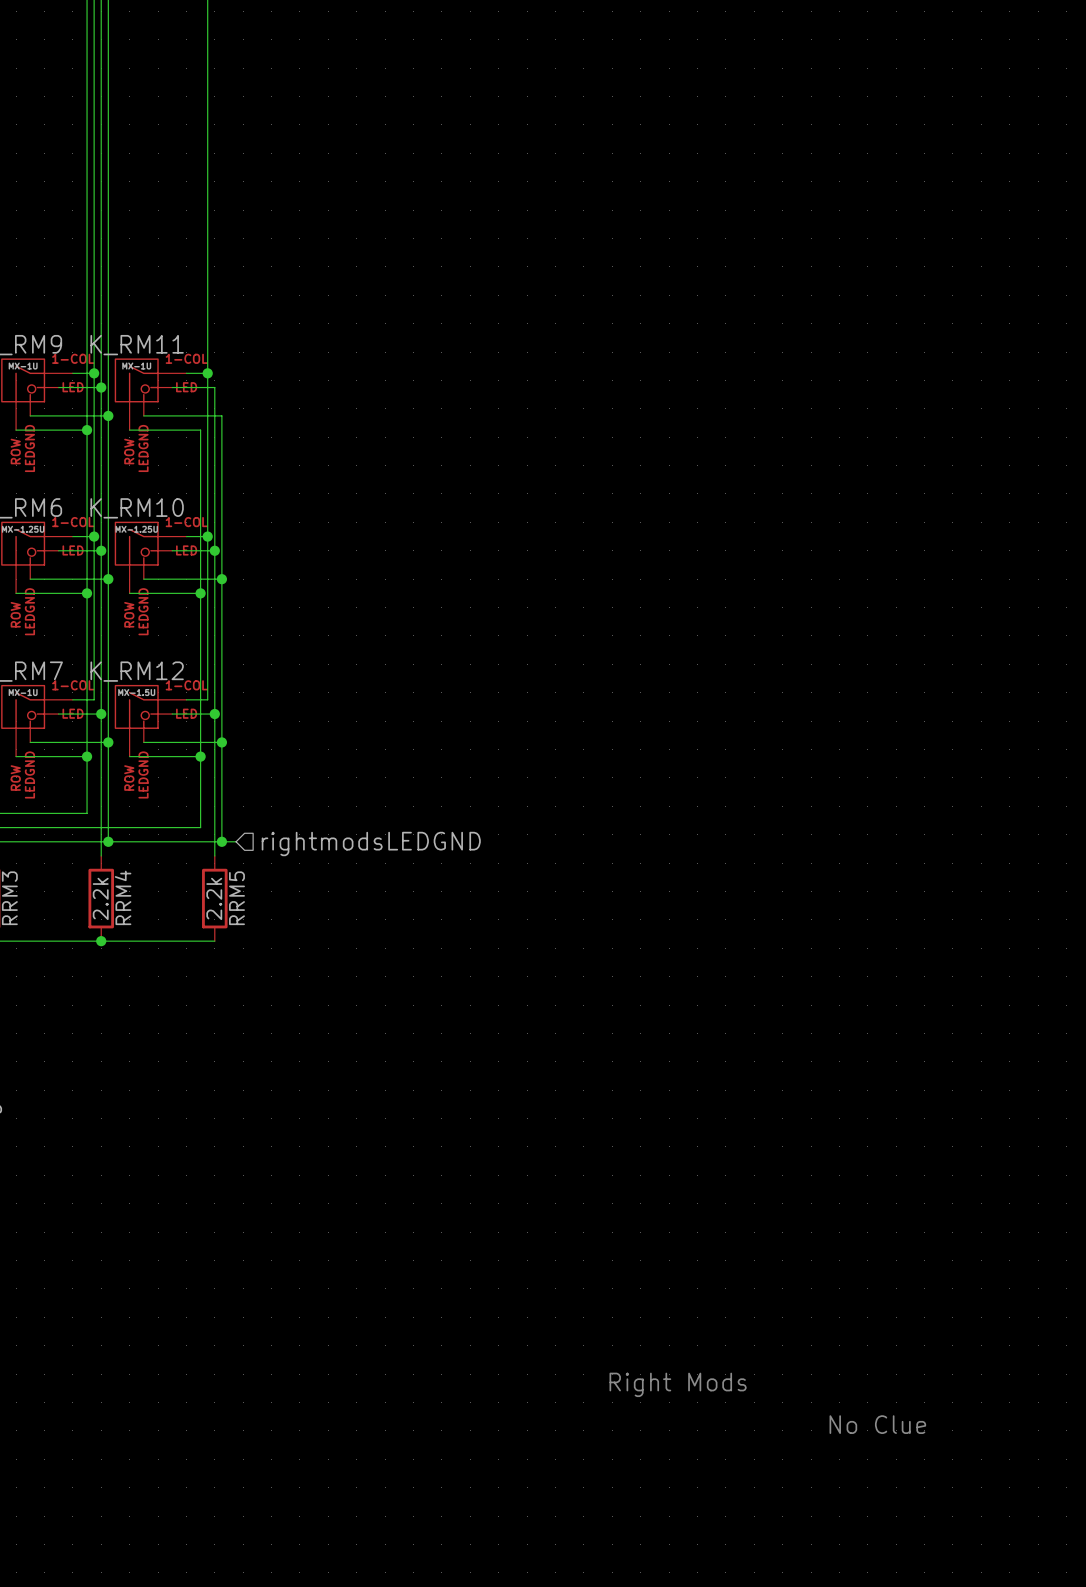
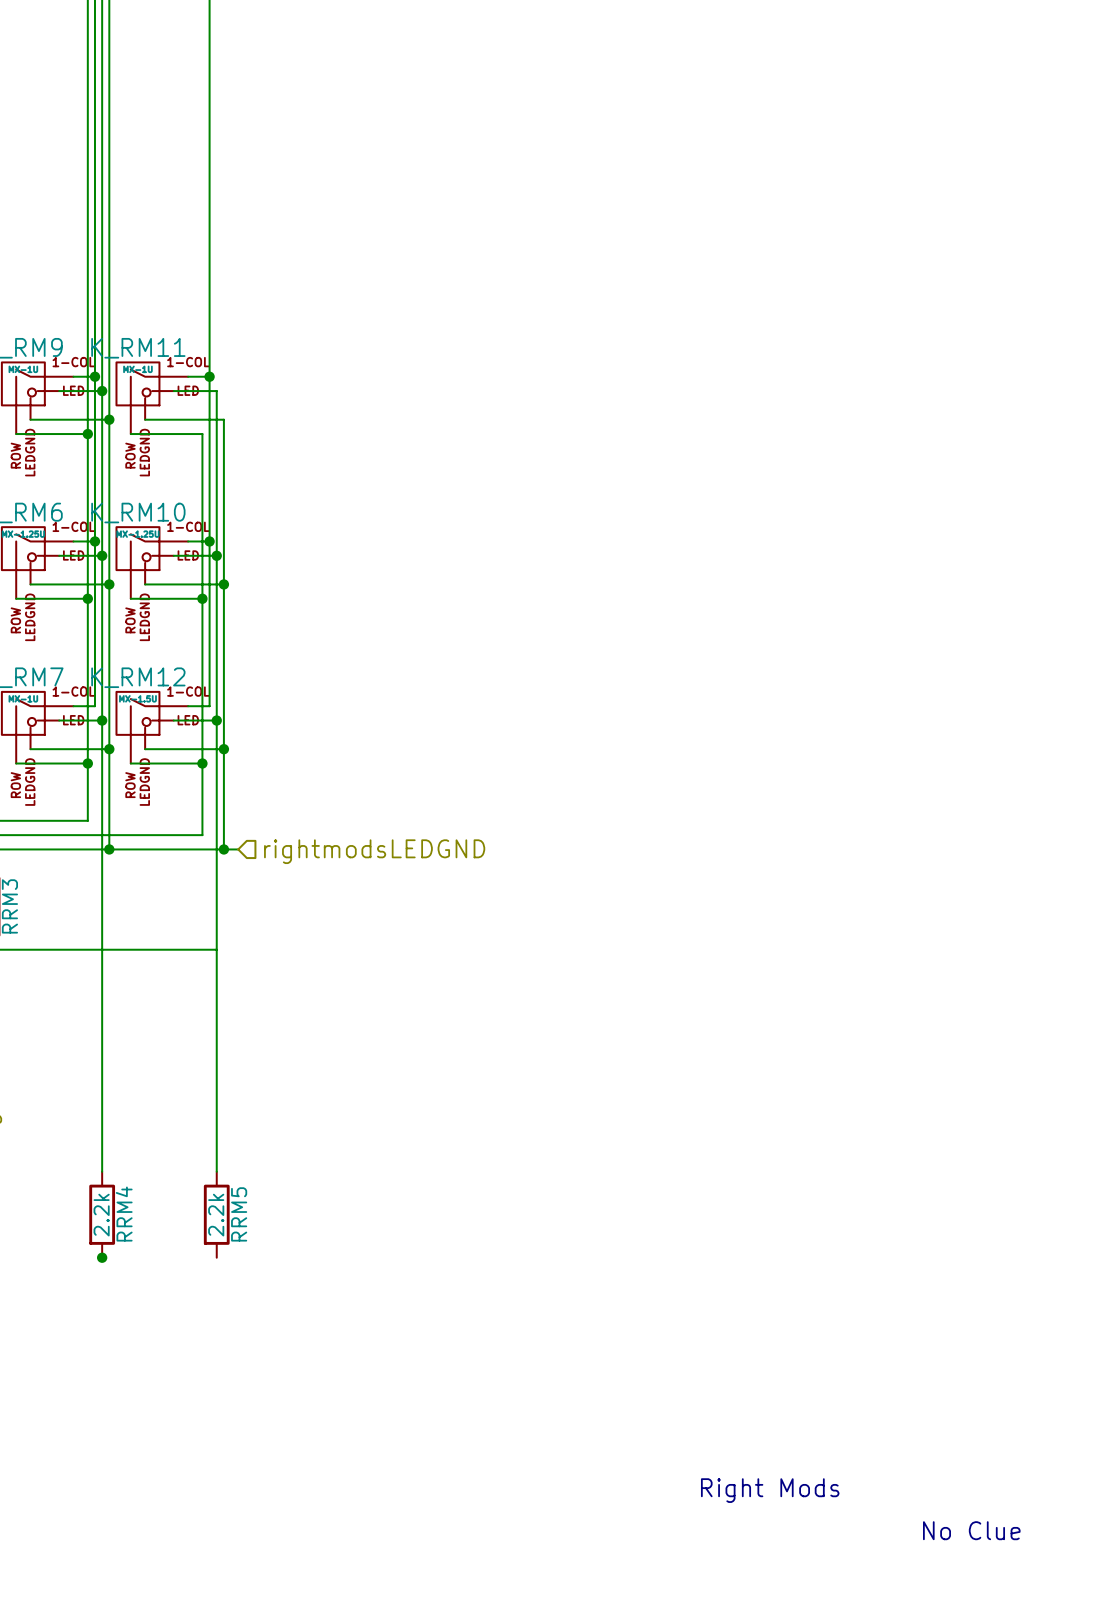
wire: none -> (102, 863) (102, 1171)
wire: none -> (216, 863) (216, 1171)
RRM4 position: (101, 898) -> (102, 1214)
RRM5 position: (214, 898) -> (216, 1214)
junction: (101, 941) -> none
junction: none -> (102, 1257)
text position: Right Mods (678, 1384) -> Right Mods (770, 1490)
text position: No Clue (877, 1424) -> No Clue (971, 1530)

